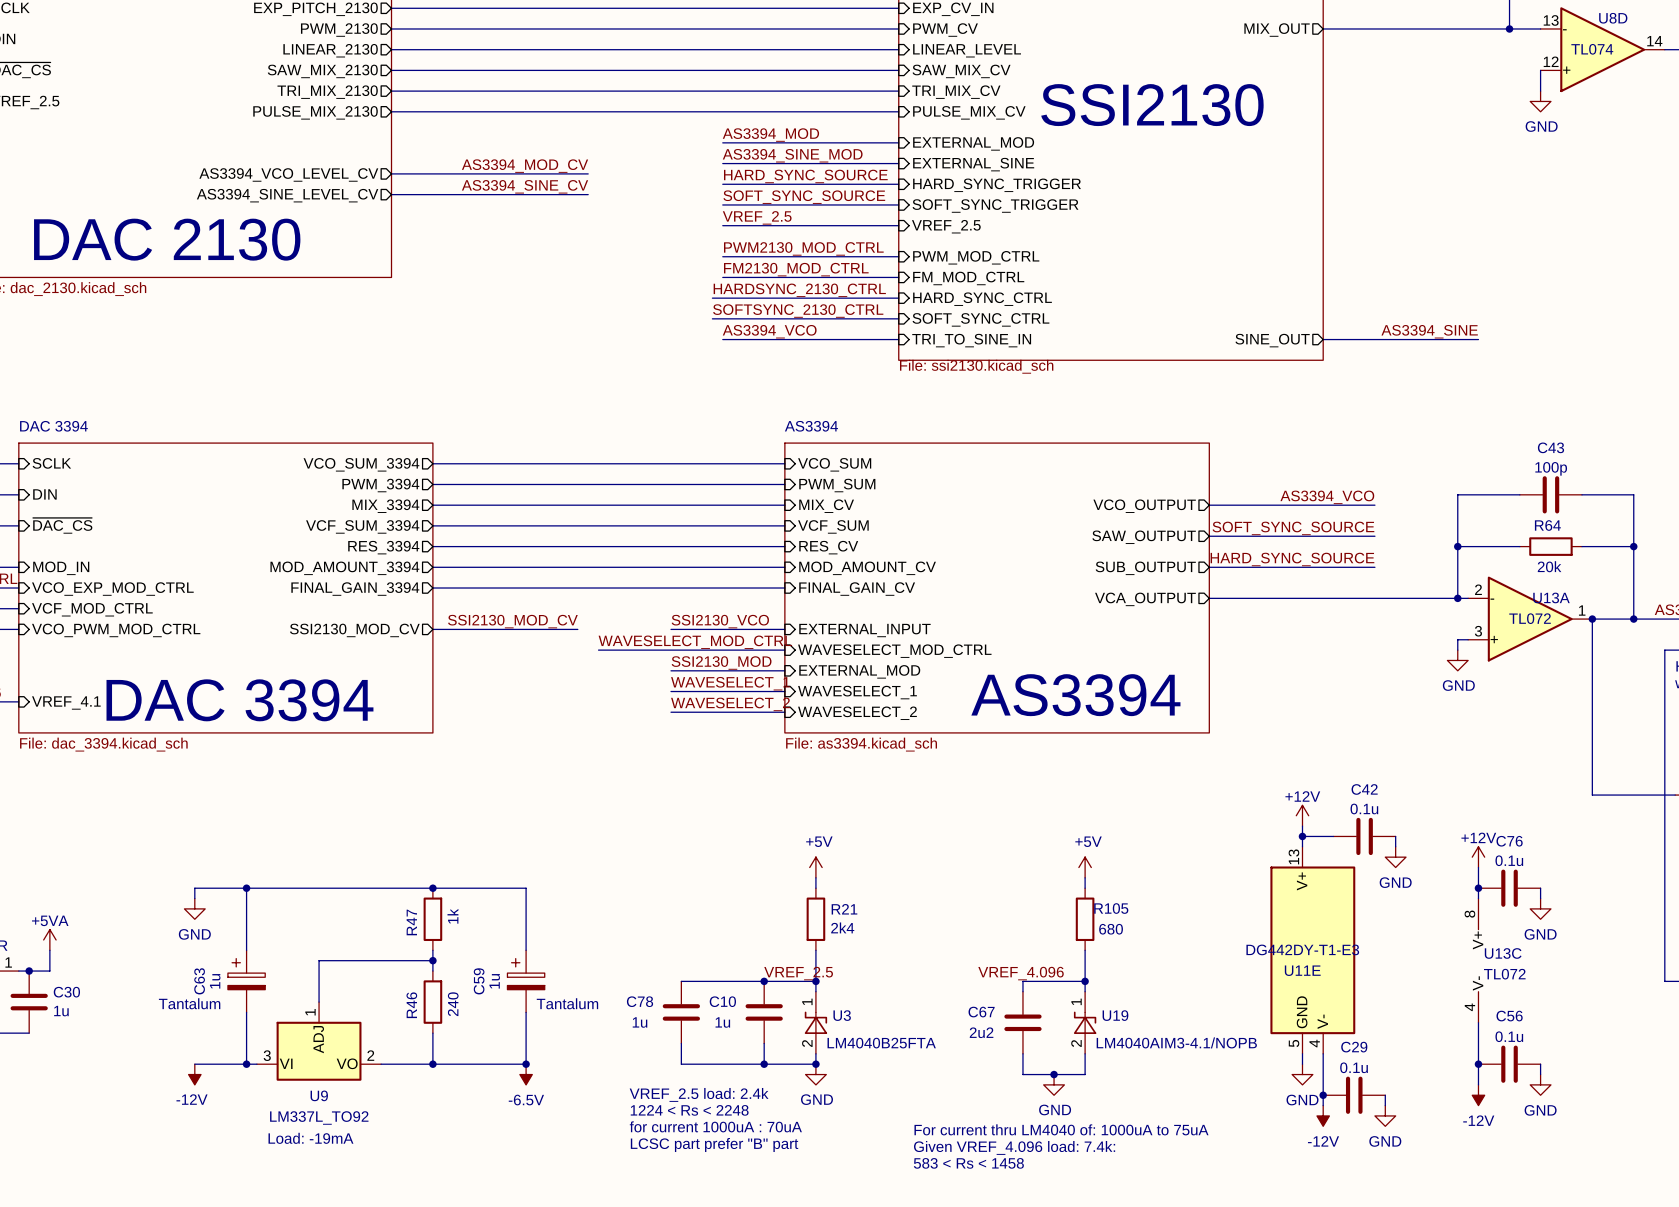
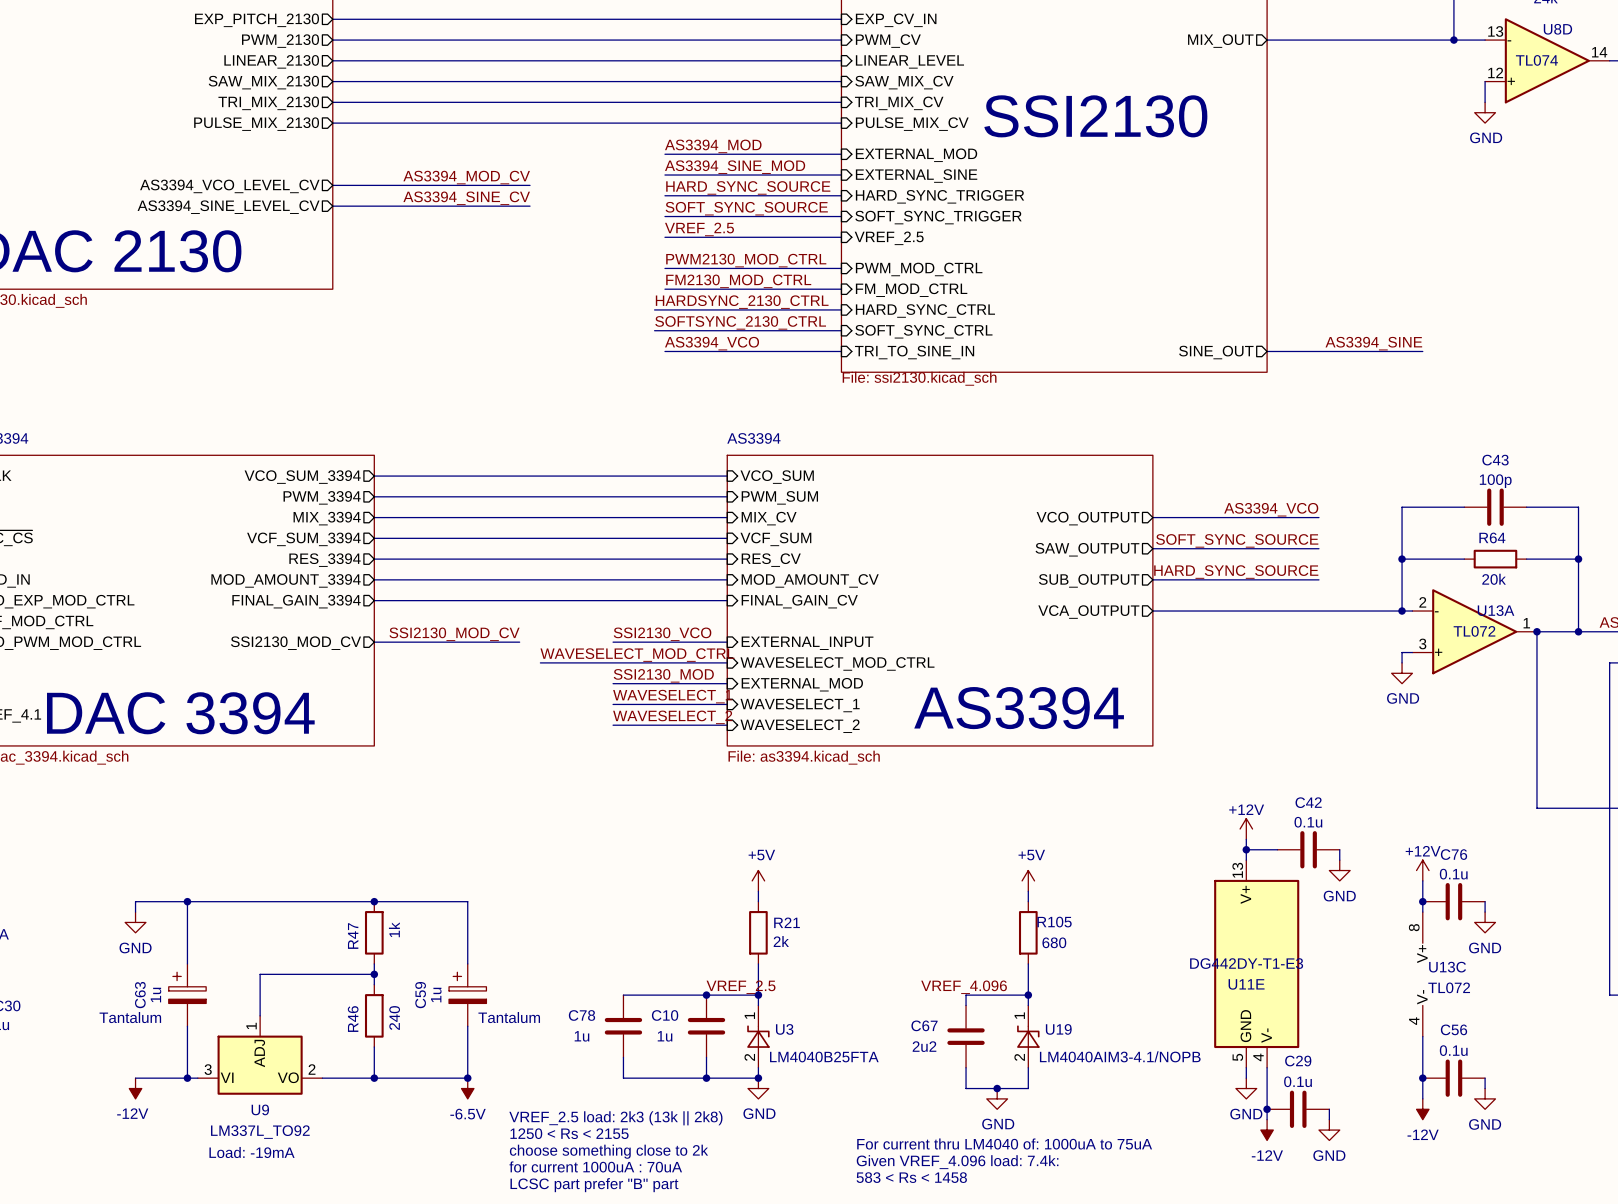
R21 value: 2k4 (842, 927) -> 2k (781, 941)
text: VREF_2.5 load: 2.4k (699, 1094) -> VREF_2.5 load: 2k3 (13k || 2k8) (615, 1118)
text: 1224 < Rs < 2248 (689, 1110) -> 1250 < Rs < 2155 (569, 1133)
text position: for current 1000uA : 70uA (715, 1126) -> for current 1000uA : 70uA (595, 1166)
text: none -> choose something close to 2k (608, 1151)
text position: LCSC part prefer "B" part (714, 1145) -> LCSC part prefer "B" part (594, 1185)

